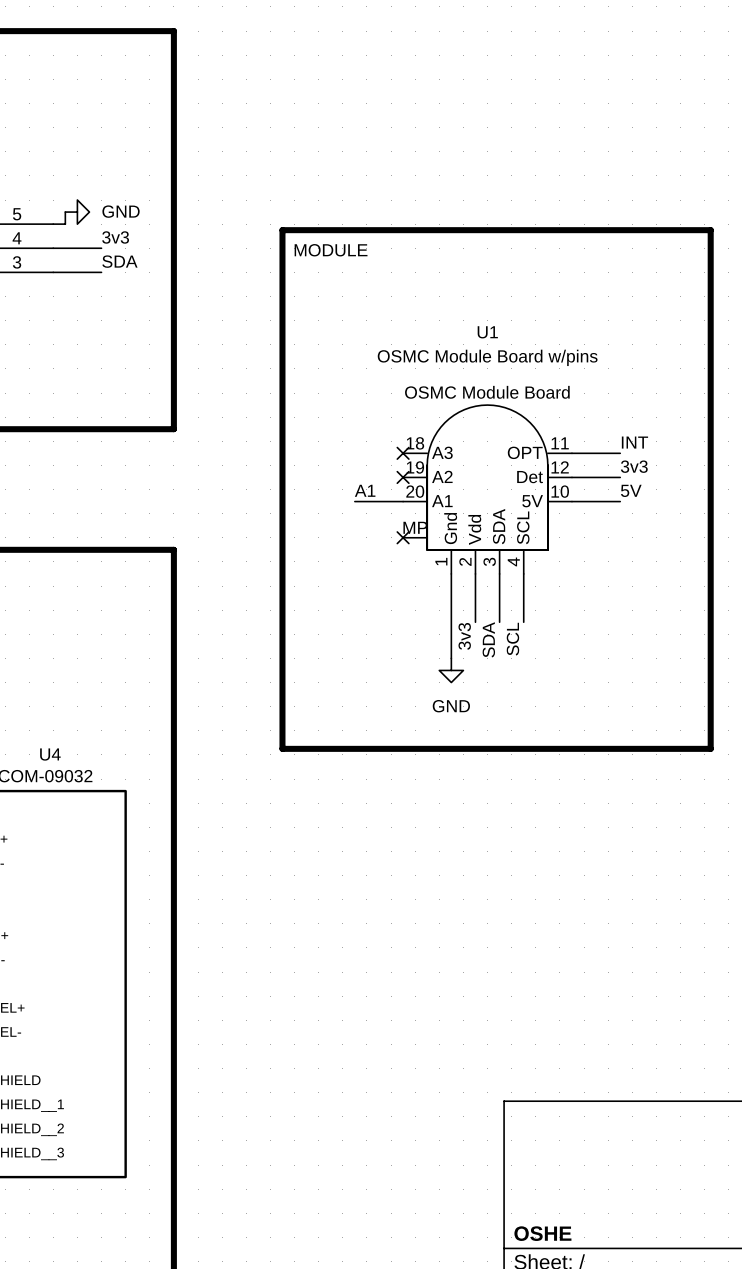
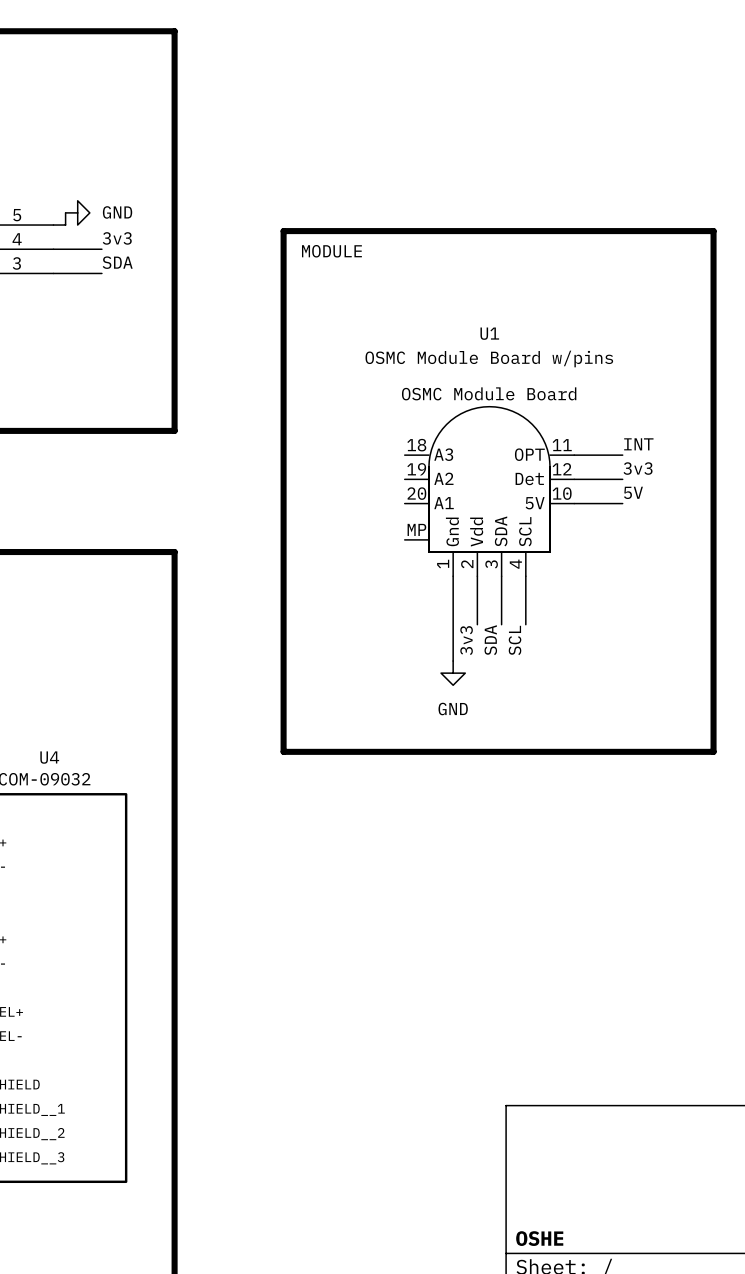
no-connect mark: (403, 453) -> none
no-connect mark: (403, 477) -> none
label: A1 (365, 490) -> none
wire: (354, 501) (403, 501) -> none
no-connect mark: (403, 537) -> none

